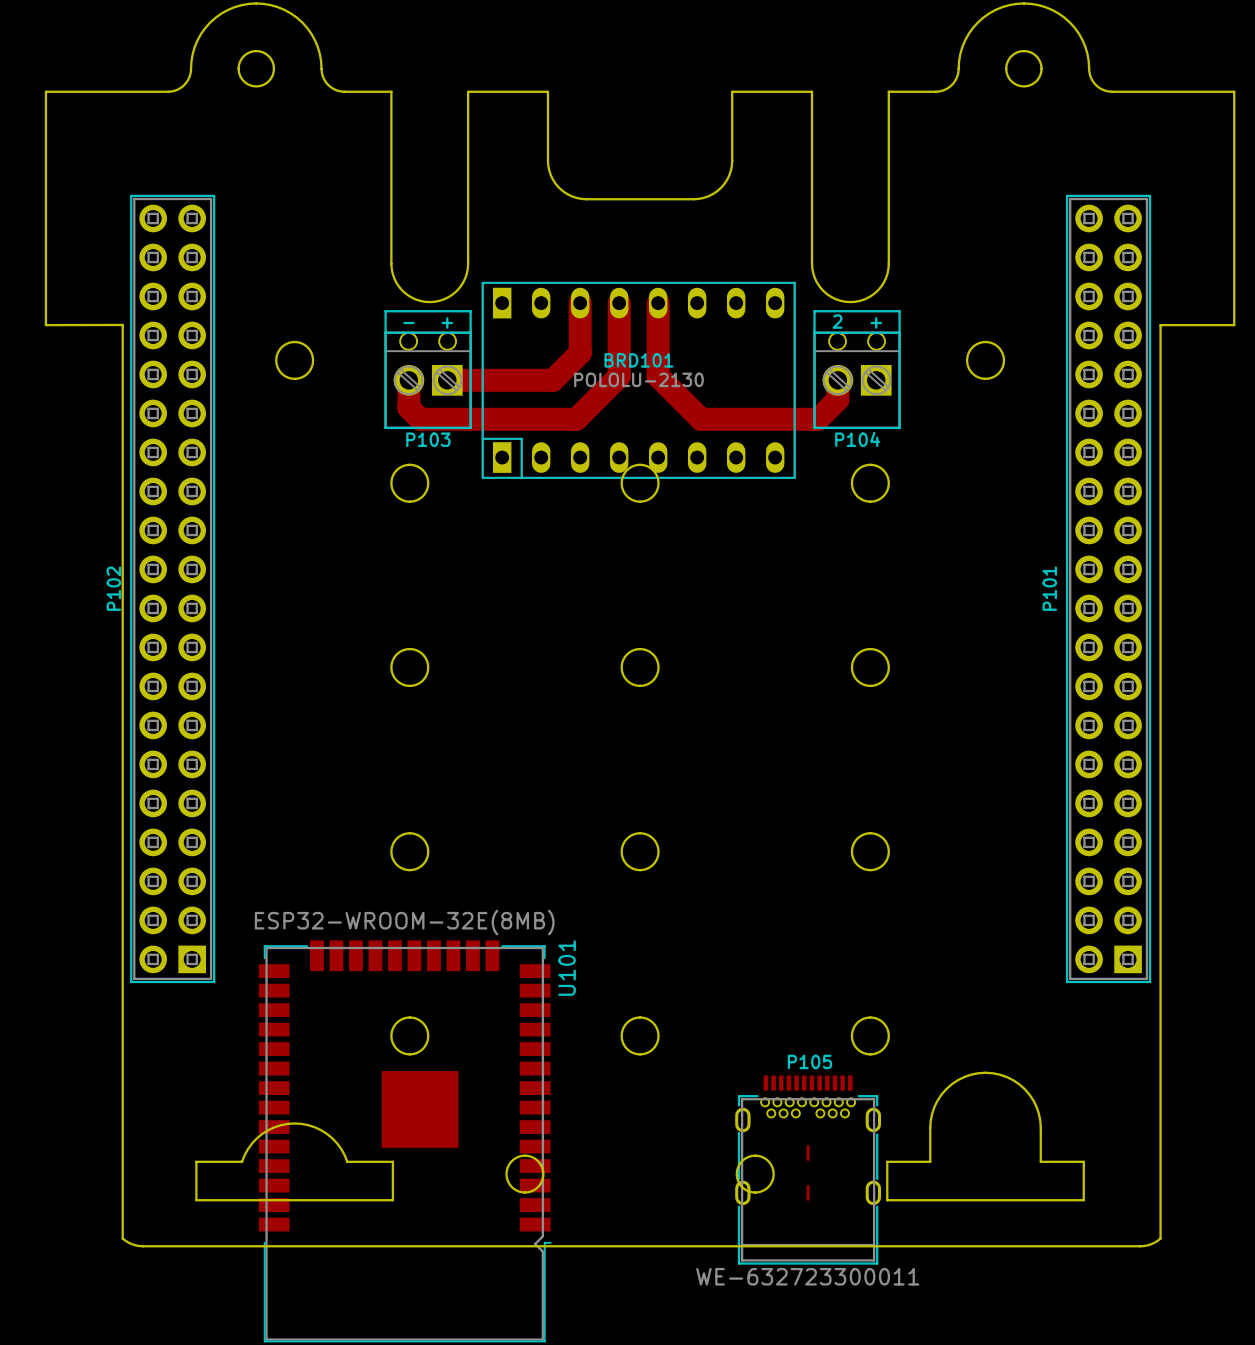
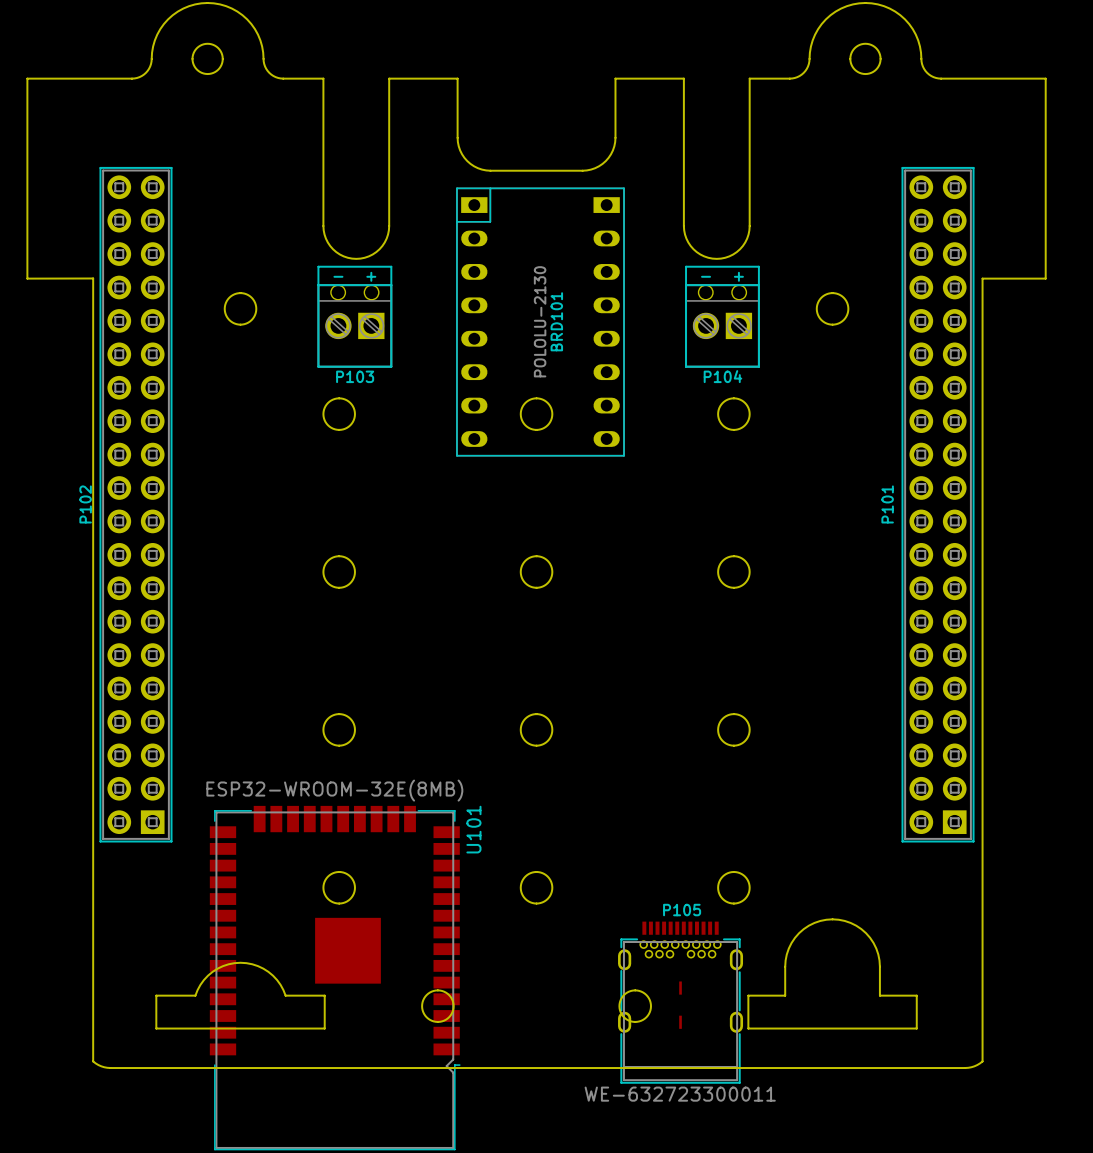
track: (580, 303) (580, 353) (552, 380) (447, 380) -> none
track: (619, 303) (619, 376) (576, 419) (420, 419) (408, 407) (408, 380) -> none
track: (658, 303) (658, 376) (701, 419) (818, 419) (837, 399) (837, 380) -> none
P104 text: 2 (837, 321) -> - (706, 276)
BRD101 rotation: 0° (638, 380) -> 90° clockwise (540, 322)

